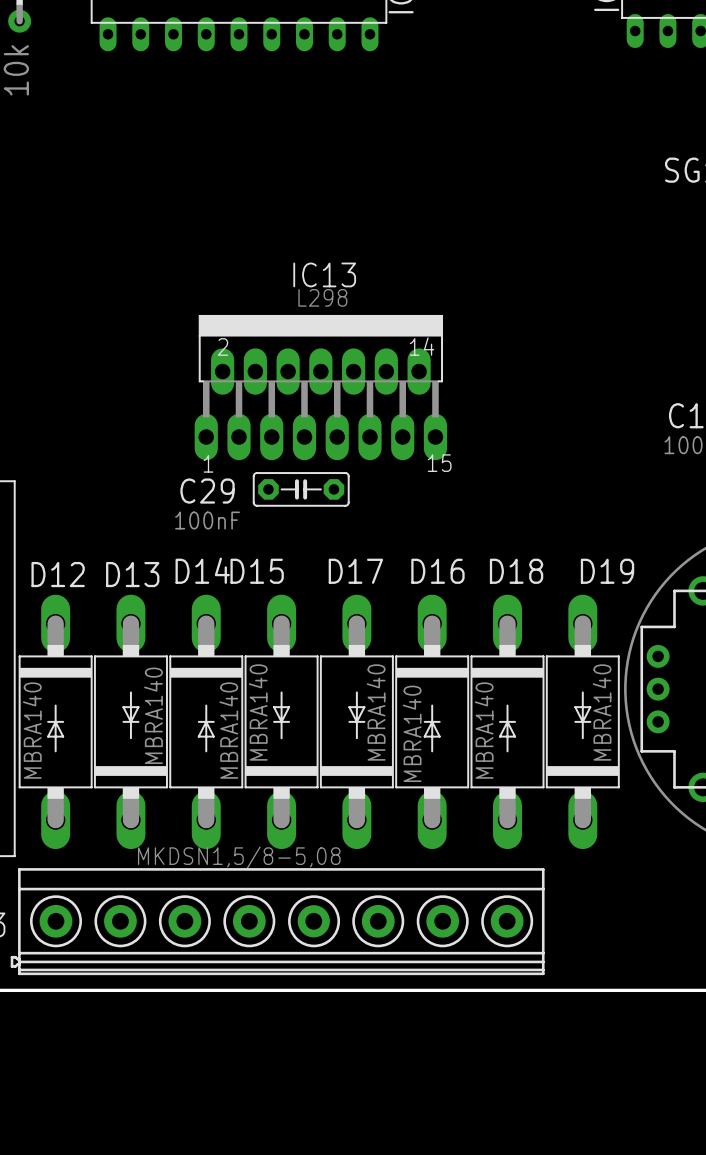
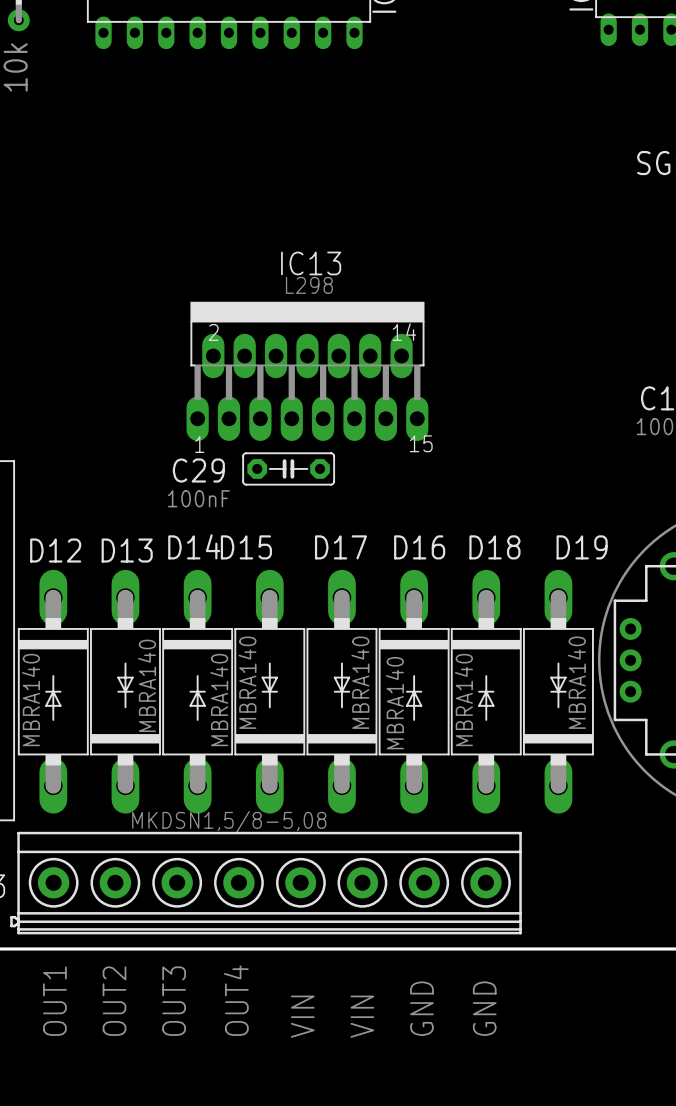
text: none -> OUT1 (54, 1001)
text: none -> OUT2 (114, 1001)
text: none -> OUT3 (174, 1001)
text: none -> OUT4 (236, 1000)
text: none -> GND (421, 1008)
text: none -> GND (484, 1008)
text: none -> VIN (302, 1016)
text: none -> VIN (362, 1016)

